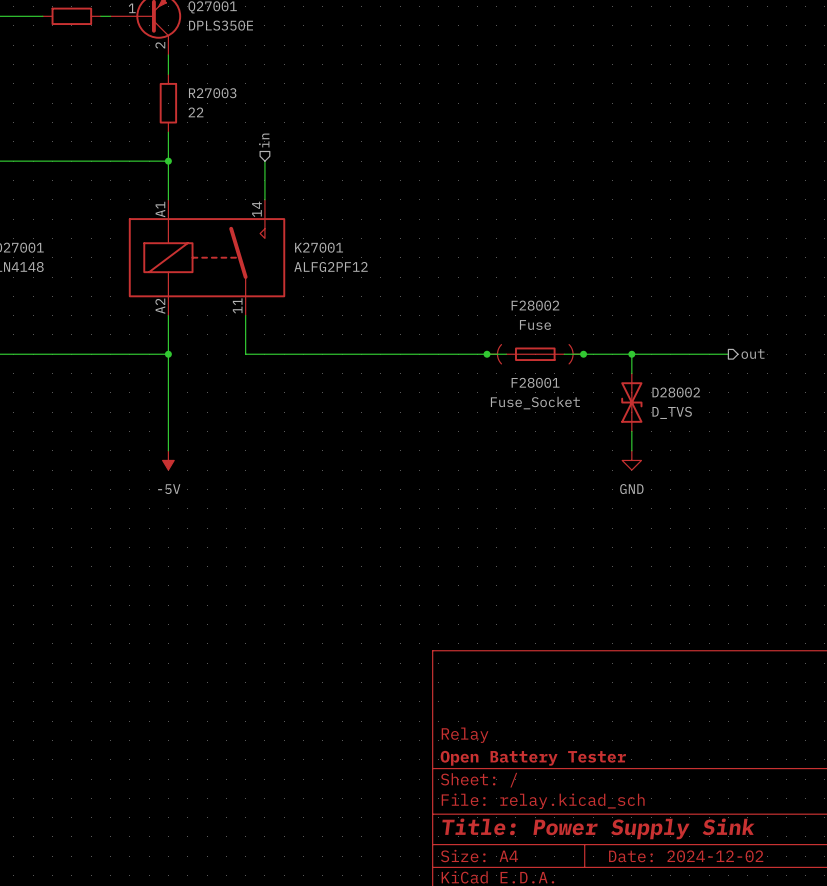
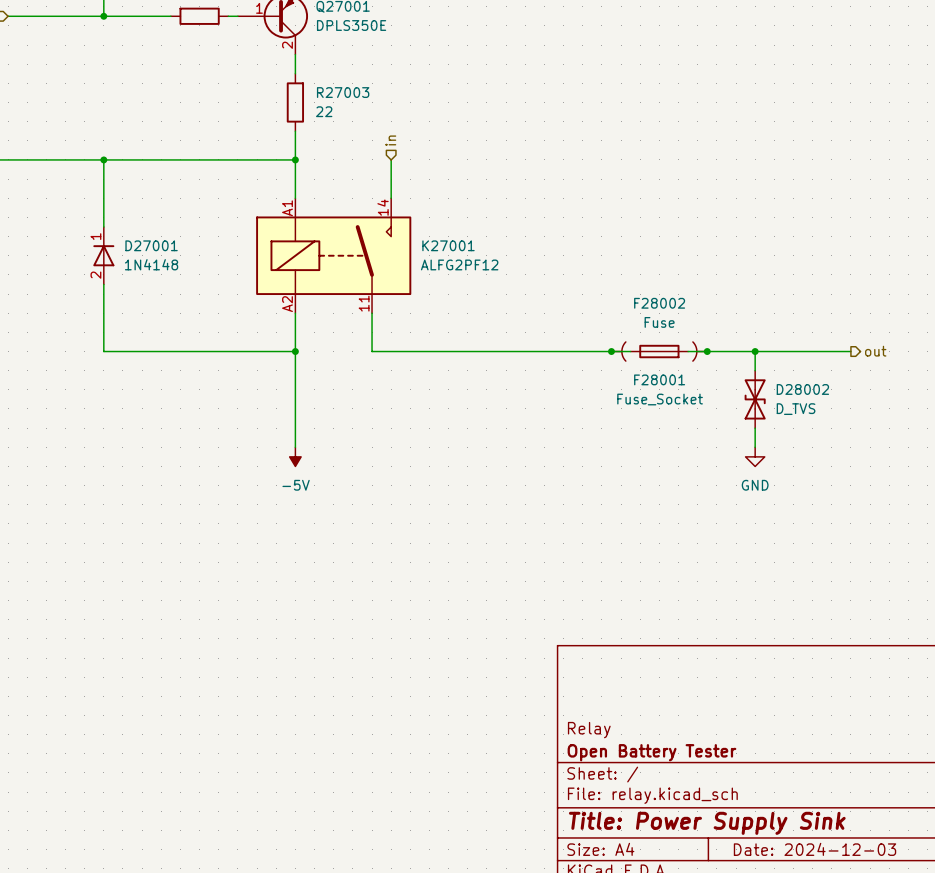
title block: Date: 2024-12-02 (686, 856) -> Date: 2024-12-03 (815, 849)

